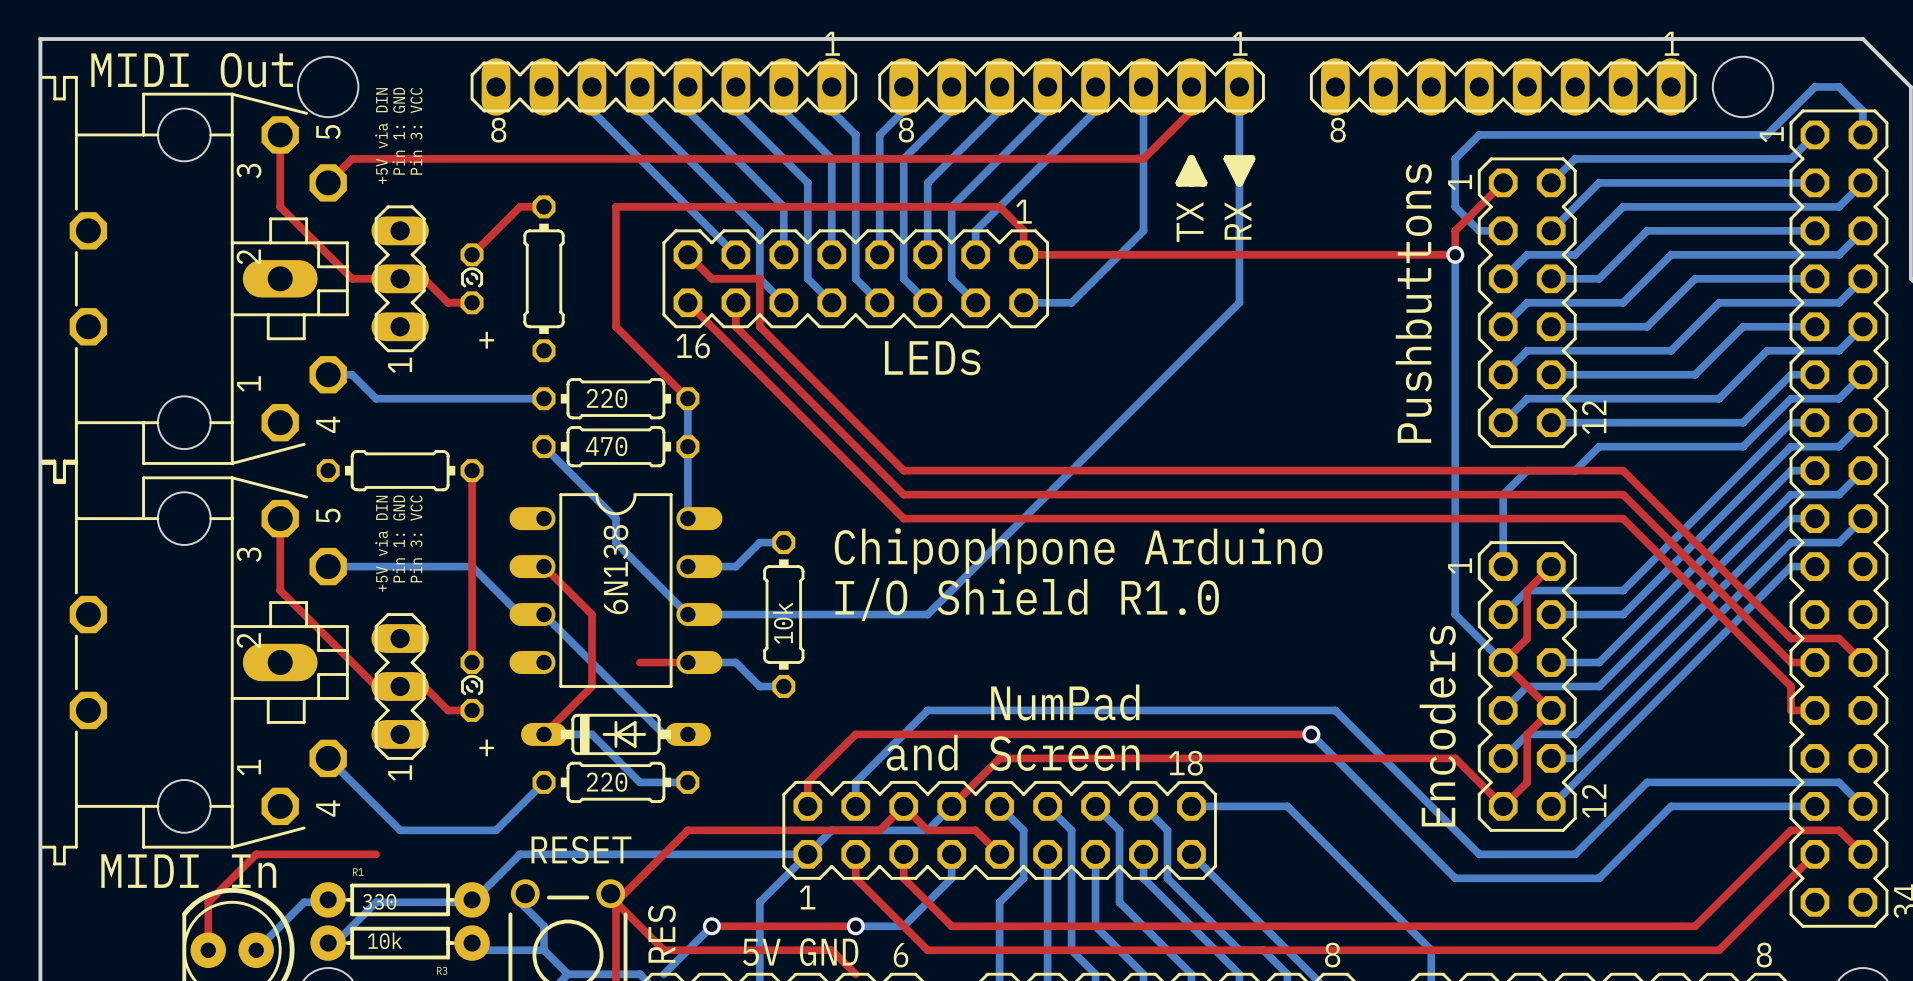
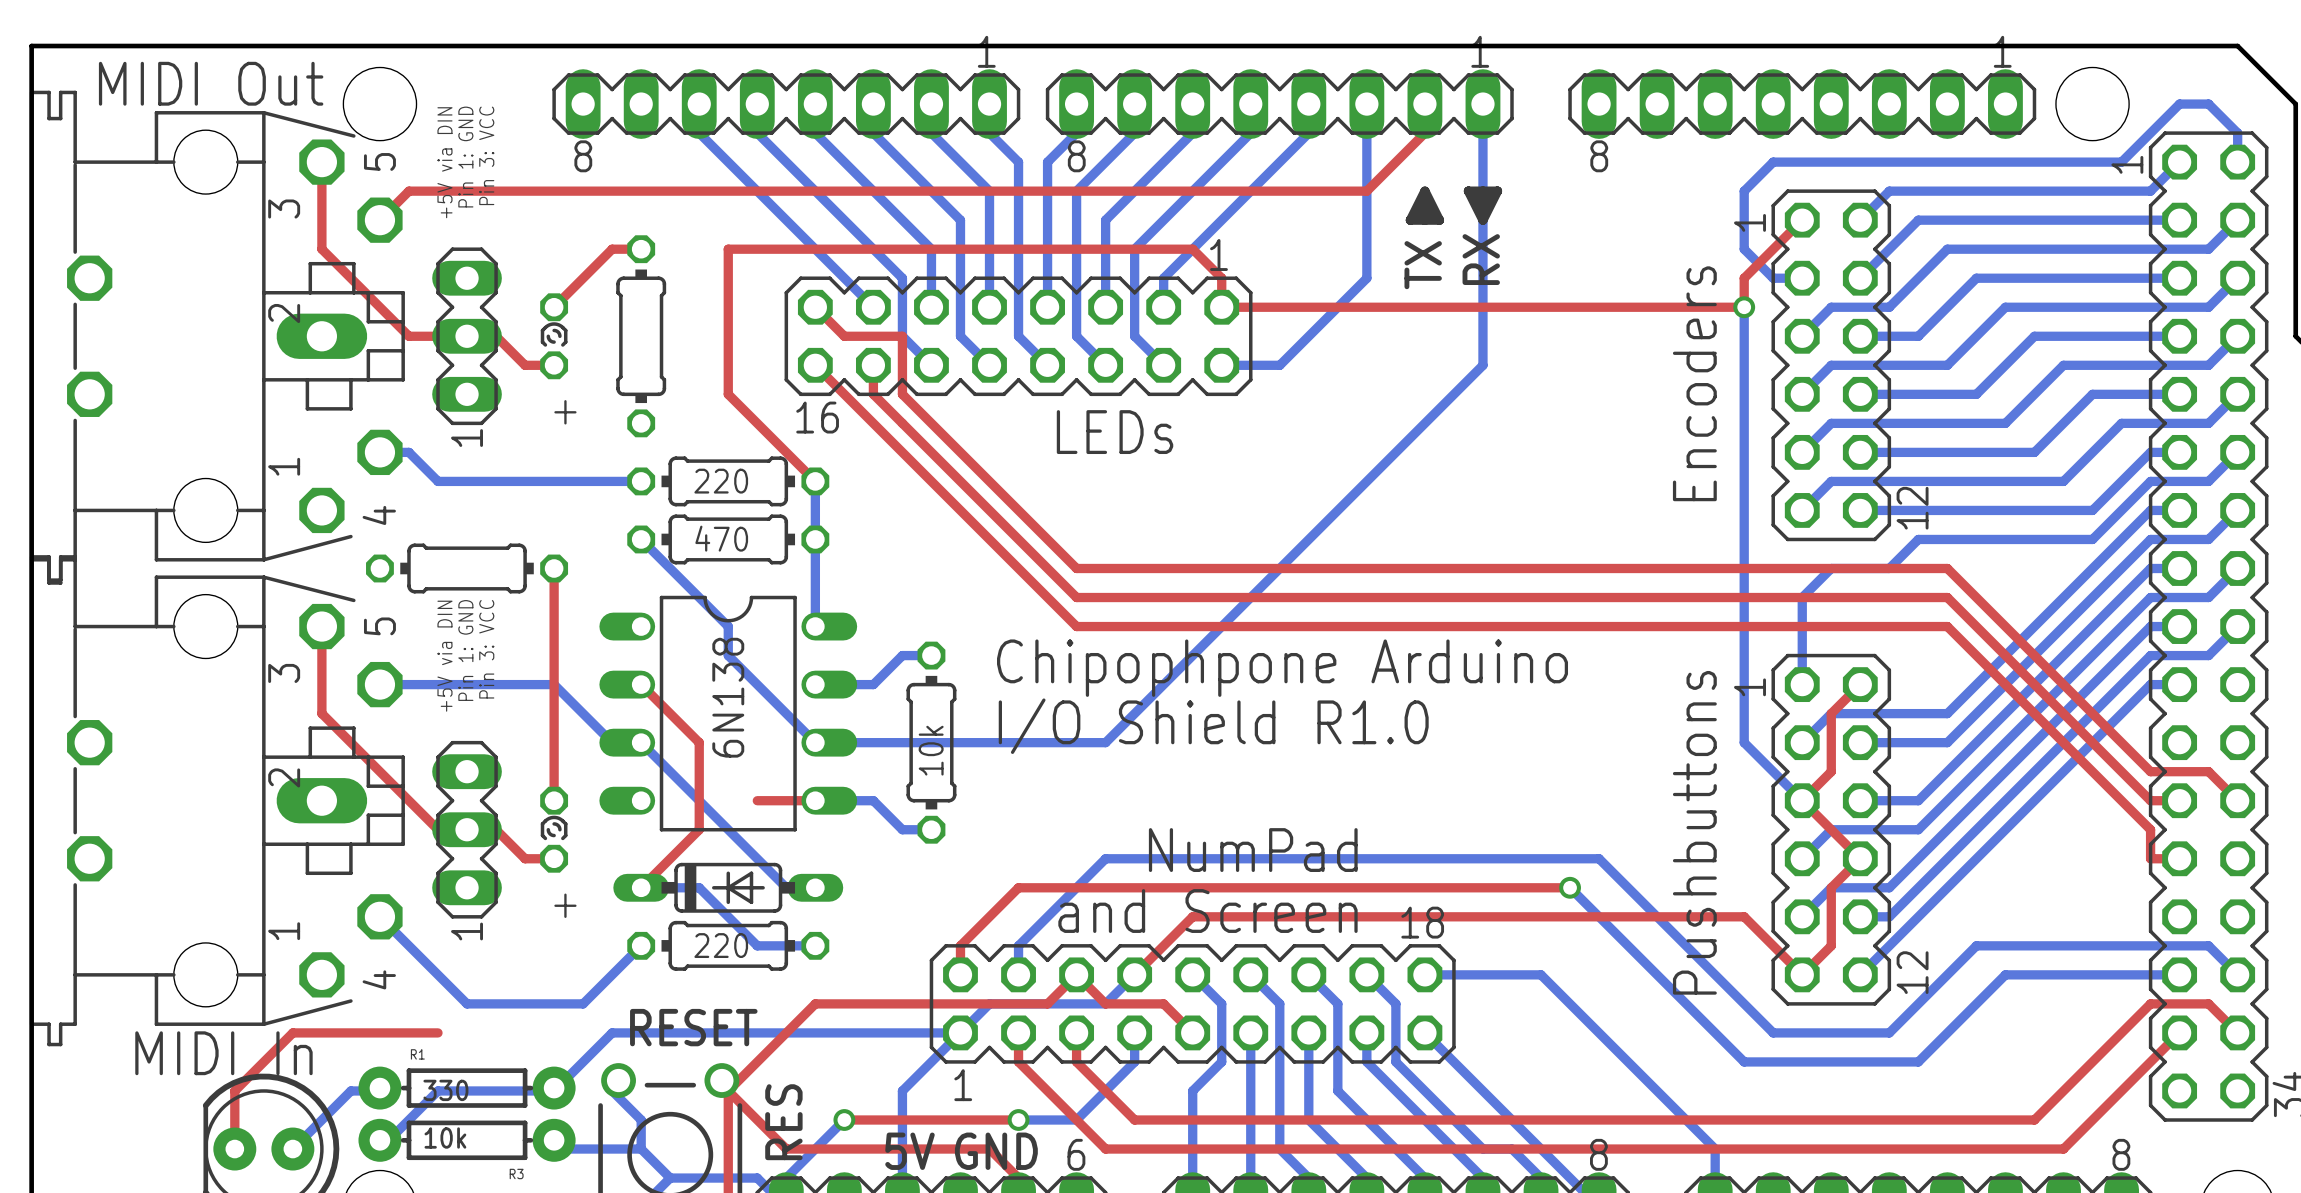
text position: Pushbuttons (1413, 303) -> Pushbuttons (1694, 832)
text position: Encoders (1437, 726) -> Encoders (1694, 383)

